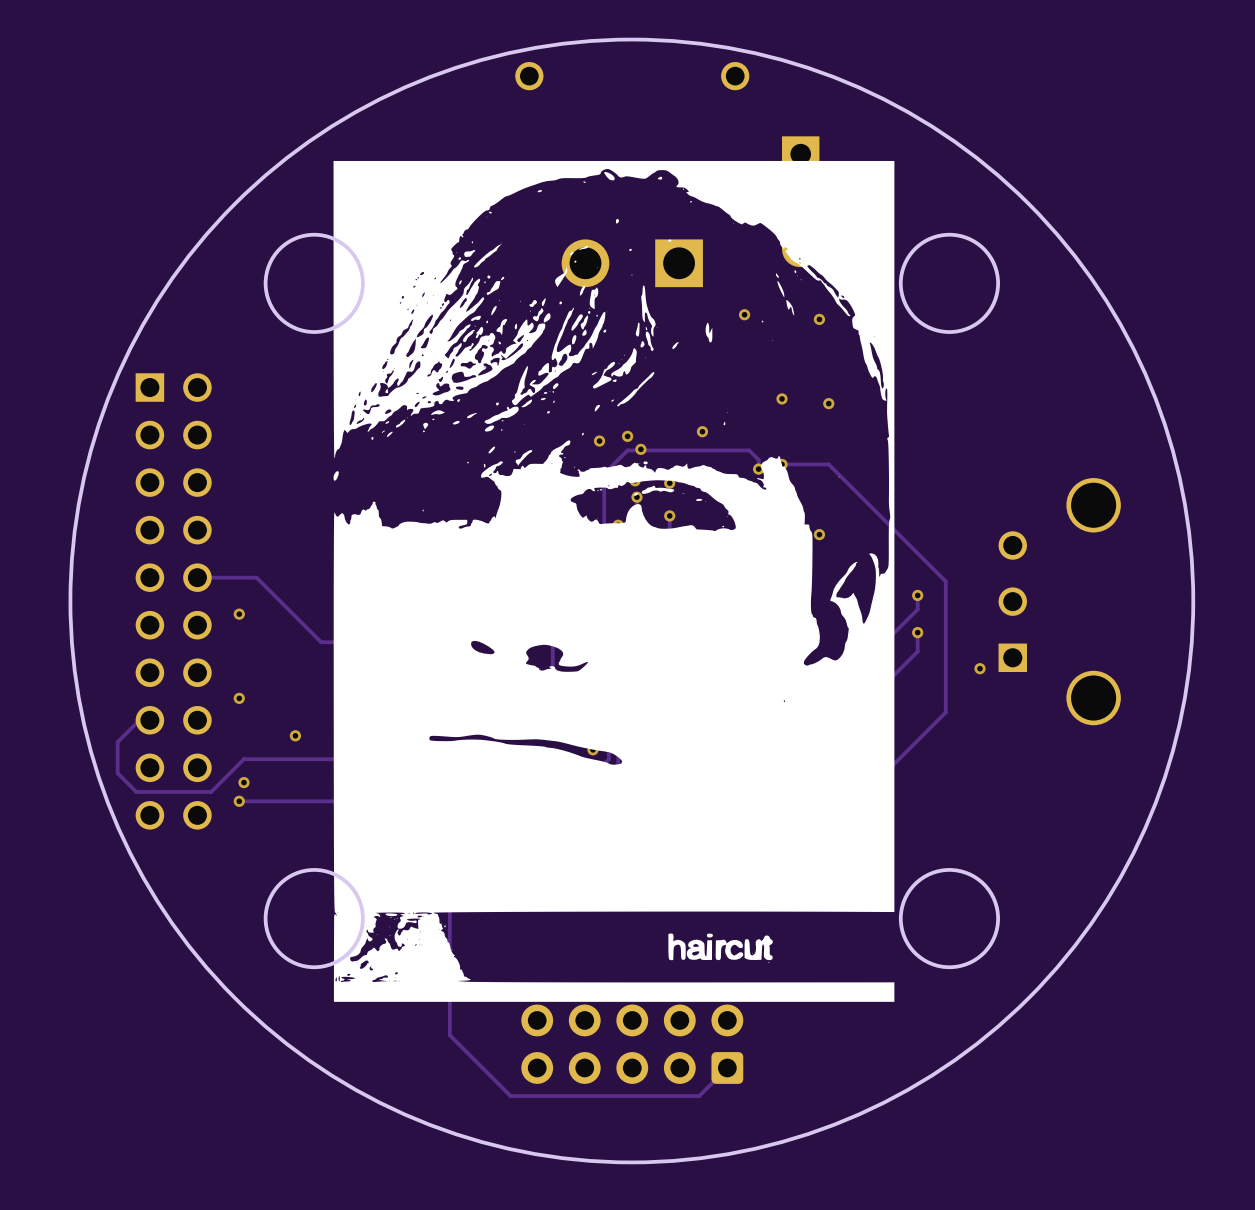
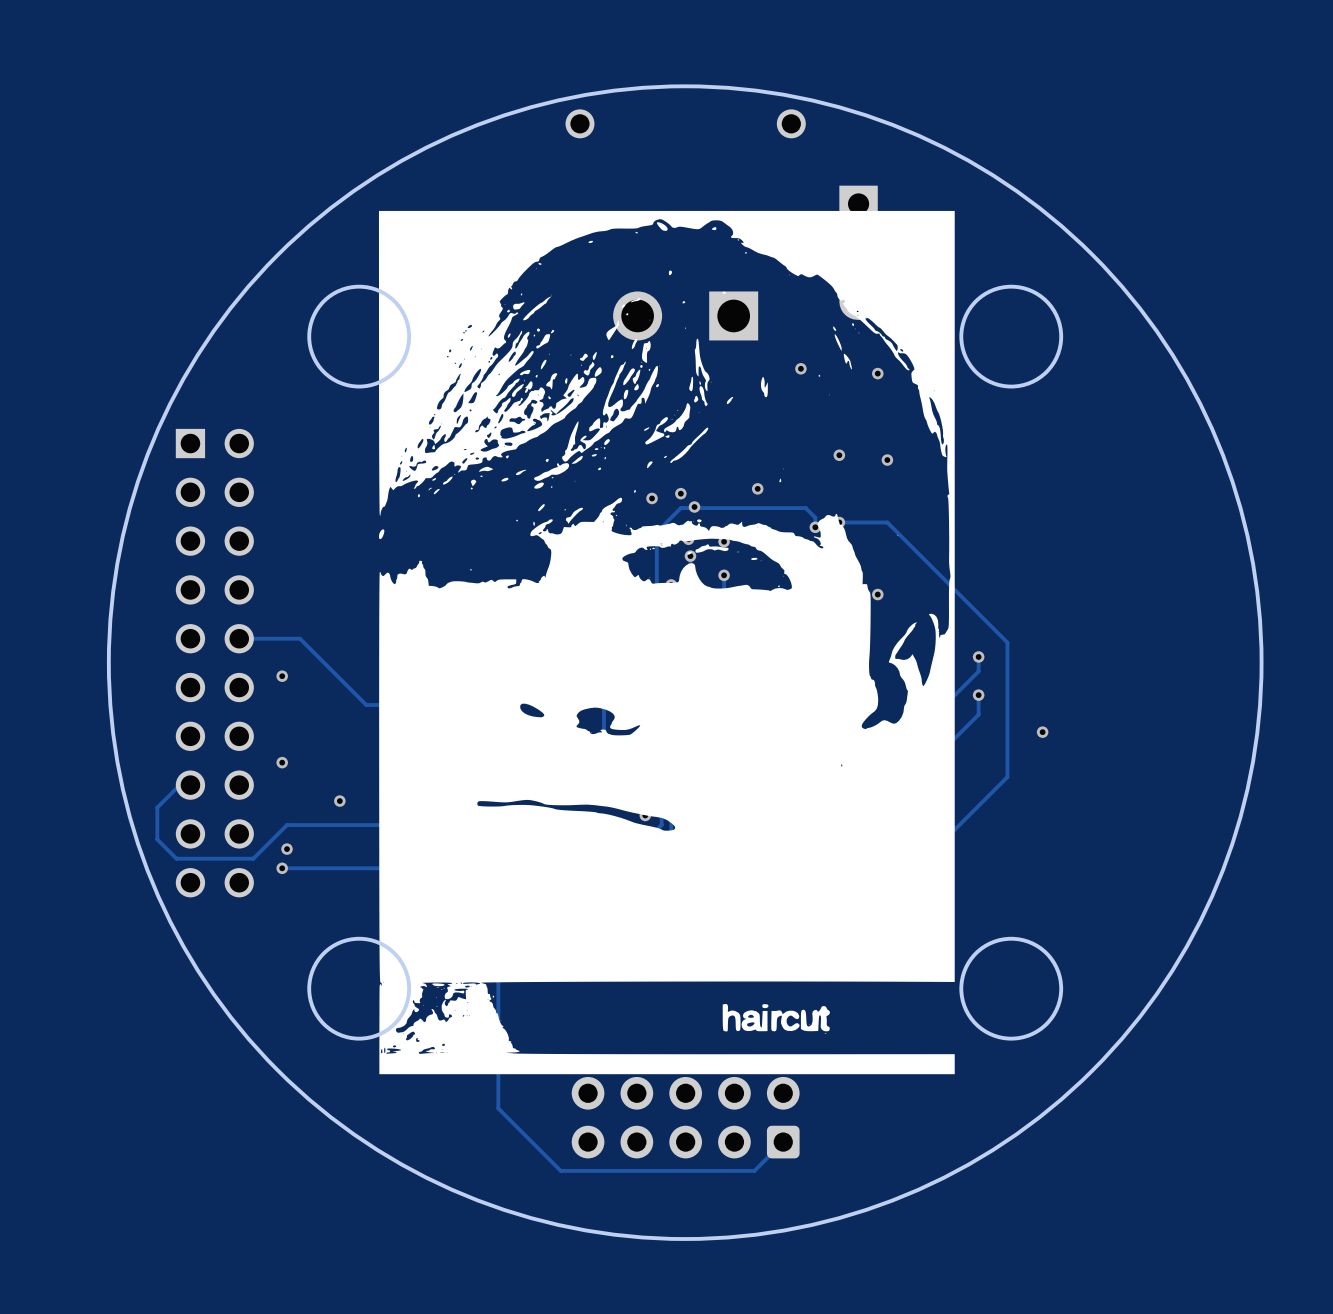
part: (1059, 601) -> none

